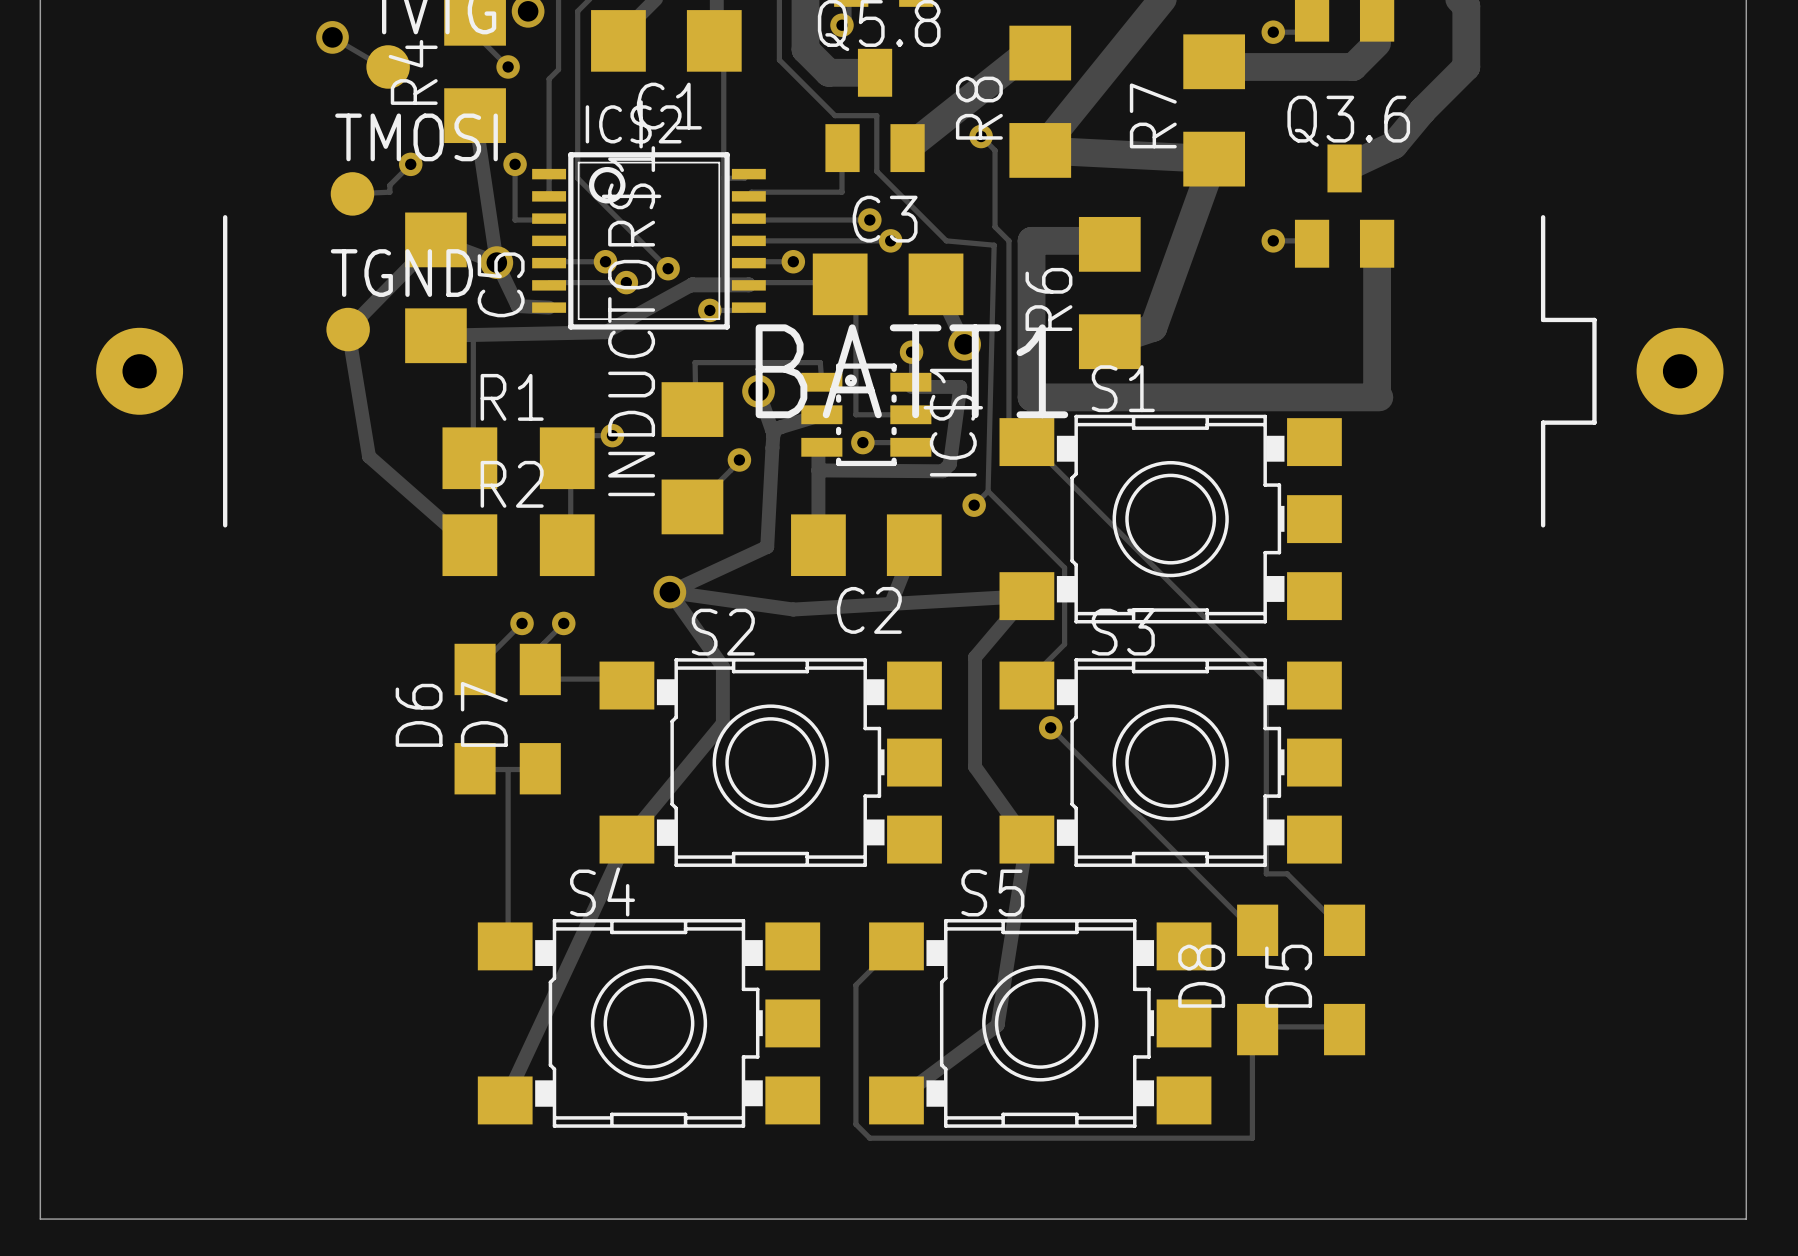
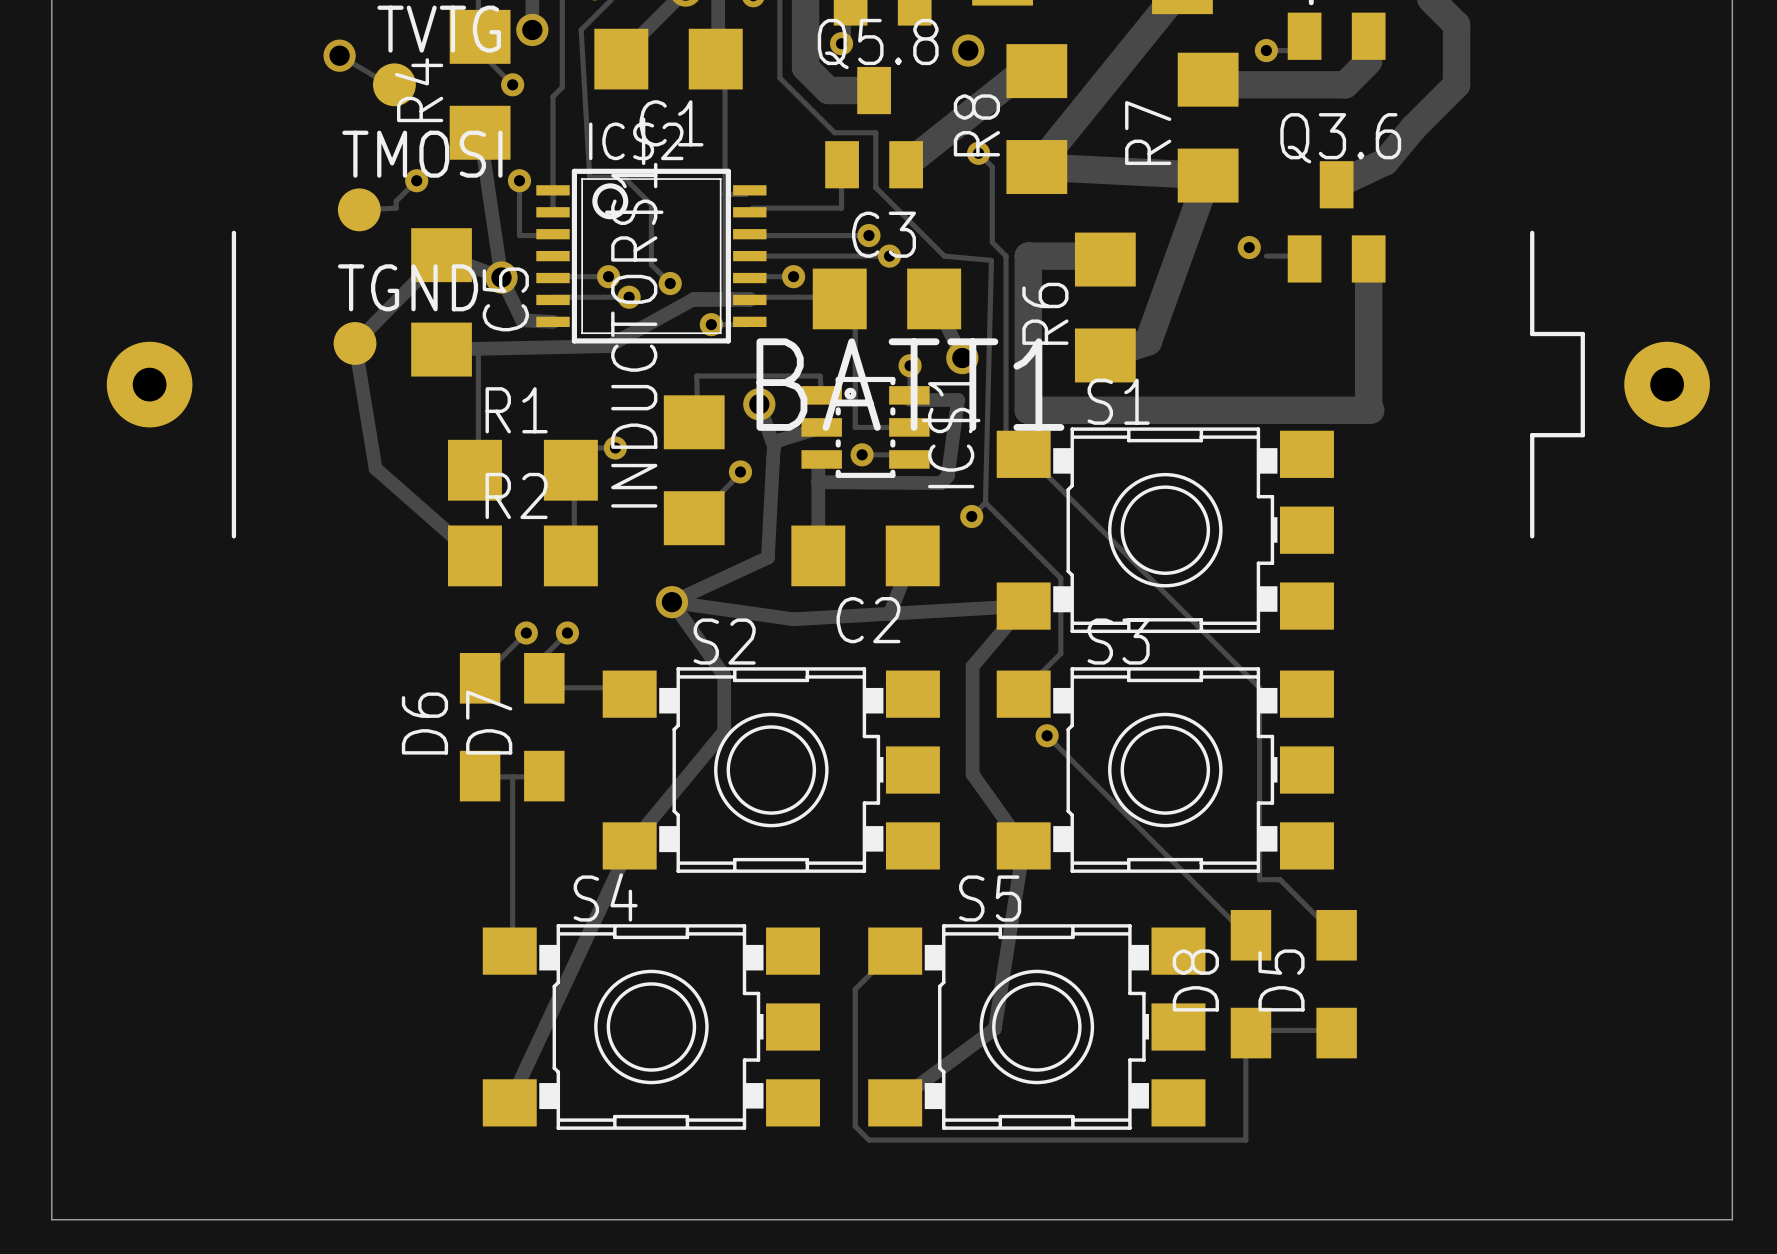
track: (577, 11) (577, 178) (648, 249) -> (581, 29) (589, 177) (623, 177) (651, 204) (651, 264)
via: none -> (968, 50)
via position: (1273, 240) -> (1249, 247)

